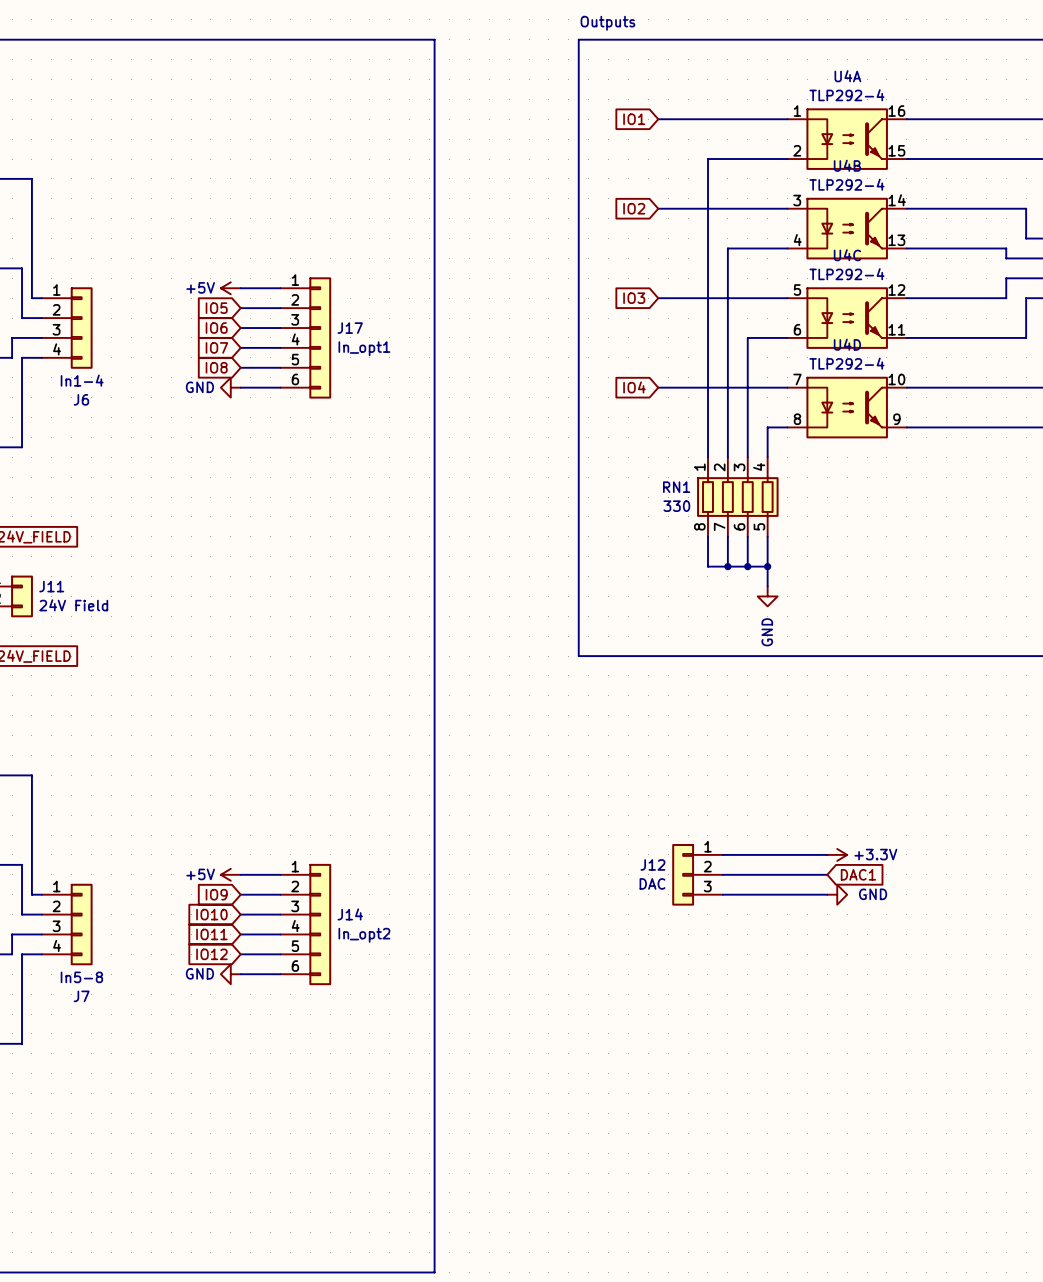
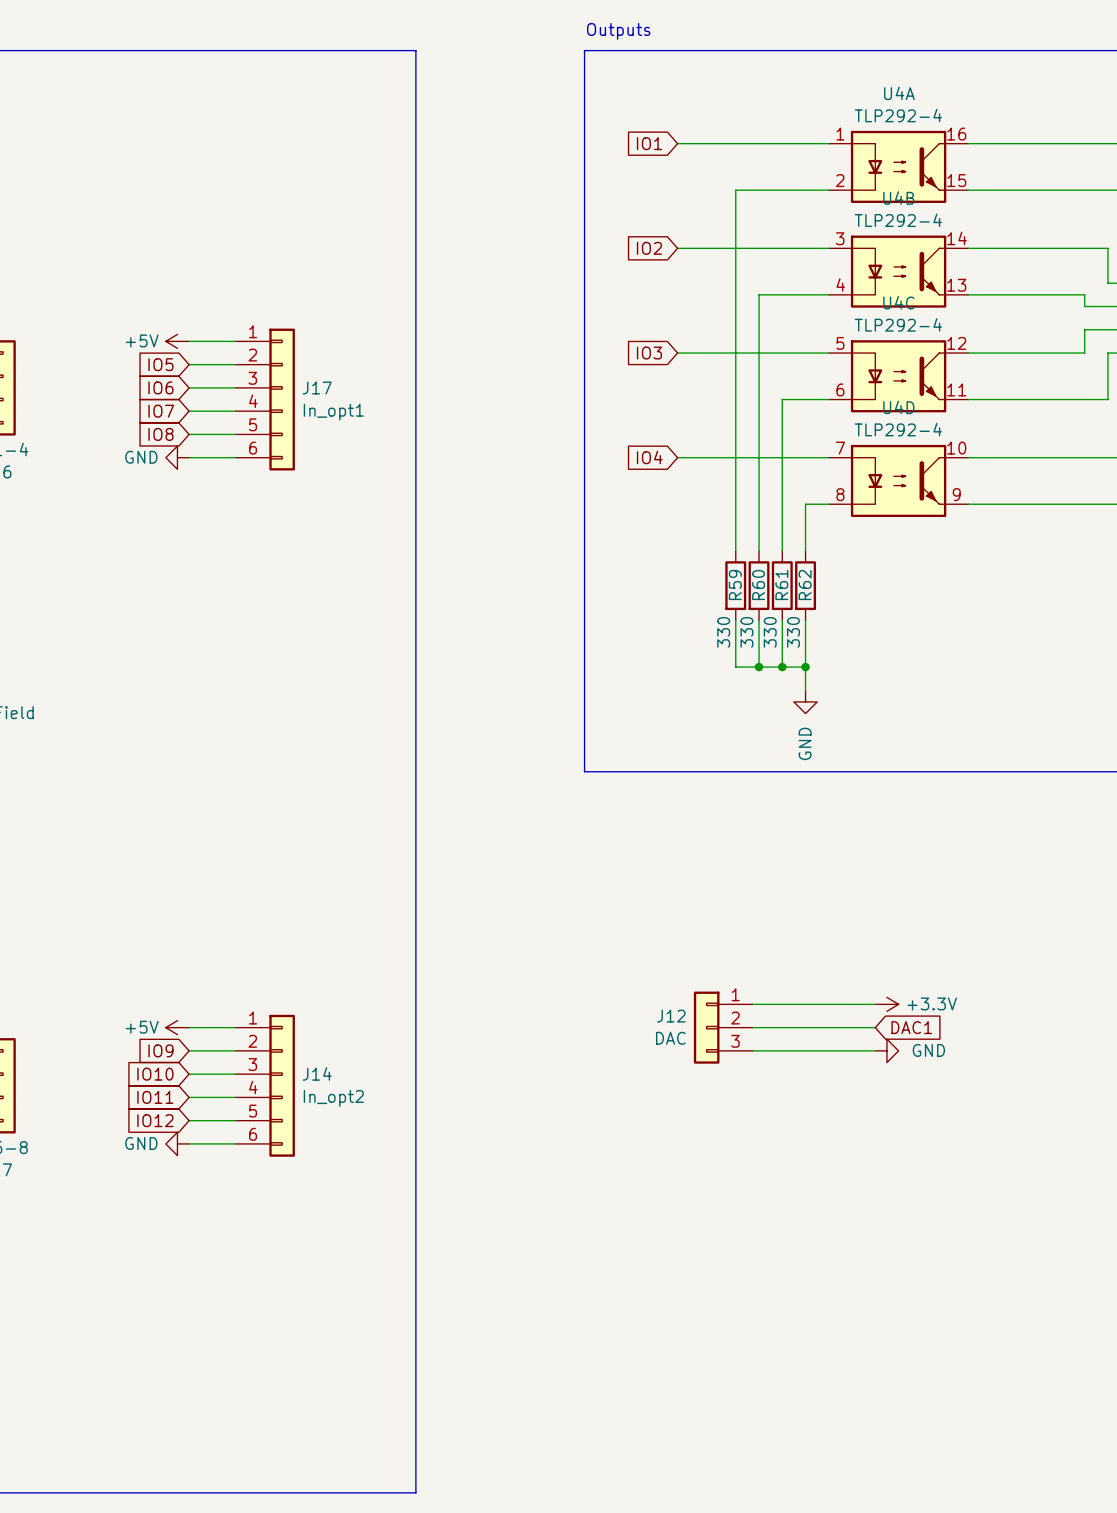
R59: none -> 330 (735, 585)
R60: none -> 330 (759, 585)
RN1: 330 (737, 497) -> none
R61: none -> 330 (782, 585)
R62: none -> 330 (805, 585)

